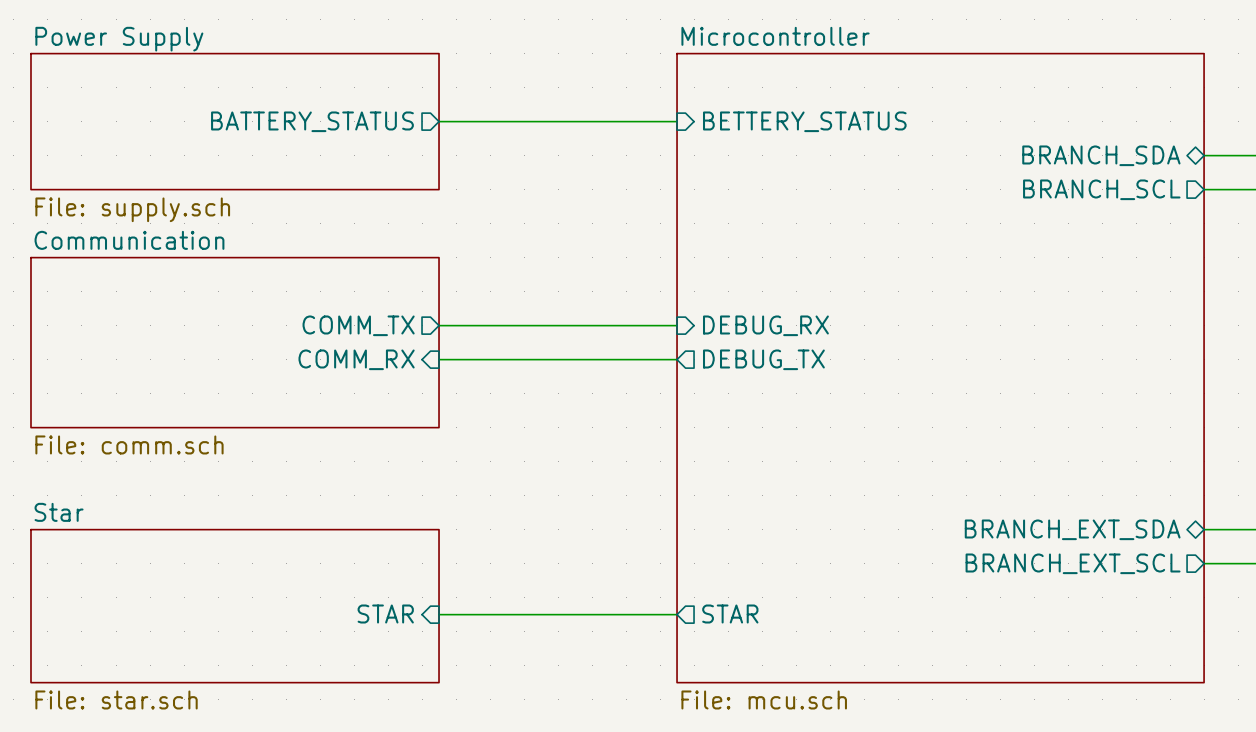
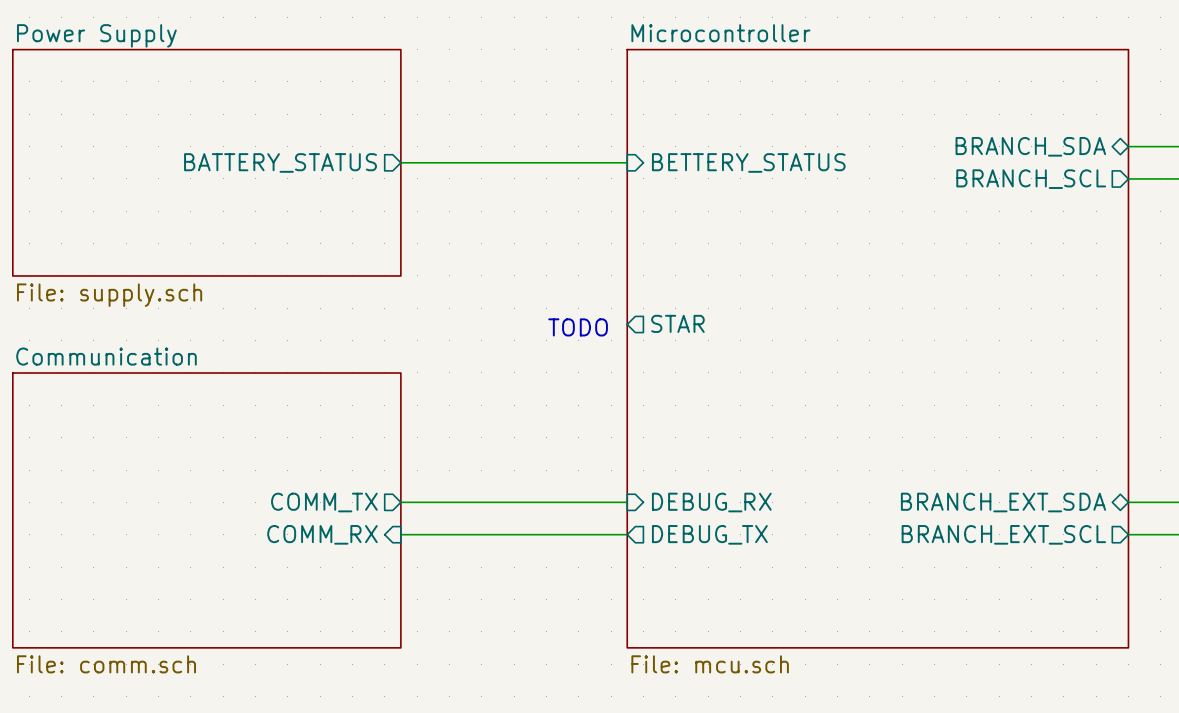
sheet Power Supply: File: supply.sch (235, 121) -> none
sheet pin position: BATTERY_STATUS (312, 121) -> BATTERY_STATUS (280, 162)
wire: (439, 121) (677, 121) -> (400, 162) (627, 162)
sheet pin position: BETTERY_STATUS (804, 121) -> BETTERY_STATUS (748, 162)
sheet Power Supply: none -> File: supply.sch (206, 162)
sheet pin position: COMM_TX (358, 325) -> COMM_TX (324, 502)
wire: (439, 325) (677, 325) -> (400, 502) (627, 502)
sheet pin position: DEBUG_RX (765, 325) -> DEBUG_RX (711, 502)
sheet pin: none -> STAR (677, 323)
sheet Communication: File: comm.sch (235, 342) -> none
text: none -> TODO (578, 327)
sheet pin position: COMM_RX (356, 359) -> COMM_RX (322, 534)
wire: (439, 359) (677, 359) -> (400, 534) (627, 534)
sheet pin position: DEBUG_TX (763, 359) -> DEBUG_TX (709, 534)
sheet Communication: none -> File: comm.sch (206, 510)
sheet Star: File: star.sch (235, 606) -> none
sheet pin: STAR (385, 614) -> none
wire: (439, 614) (677, 614) -> none
sheet pin: STAR (730, 614) -> none

